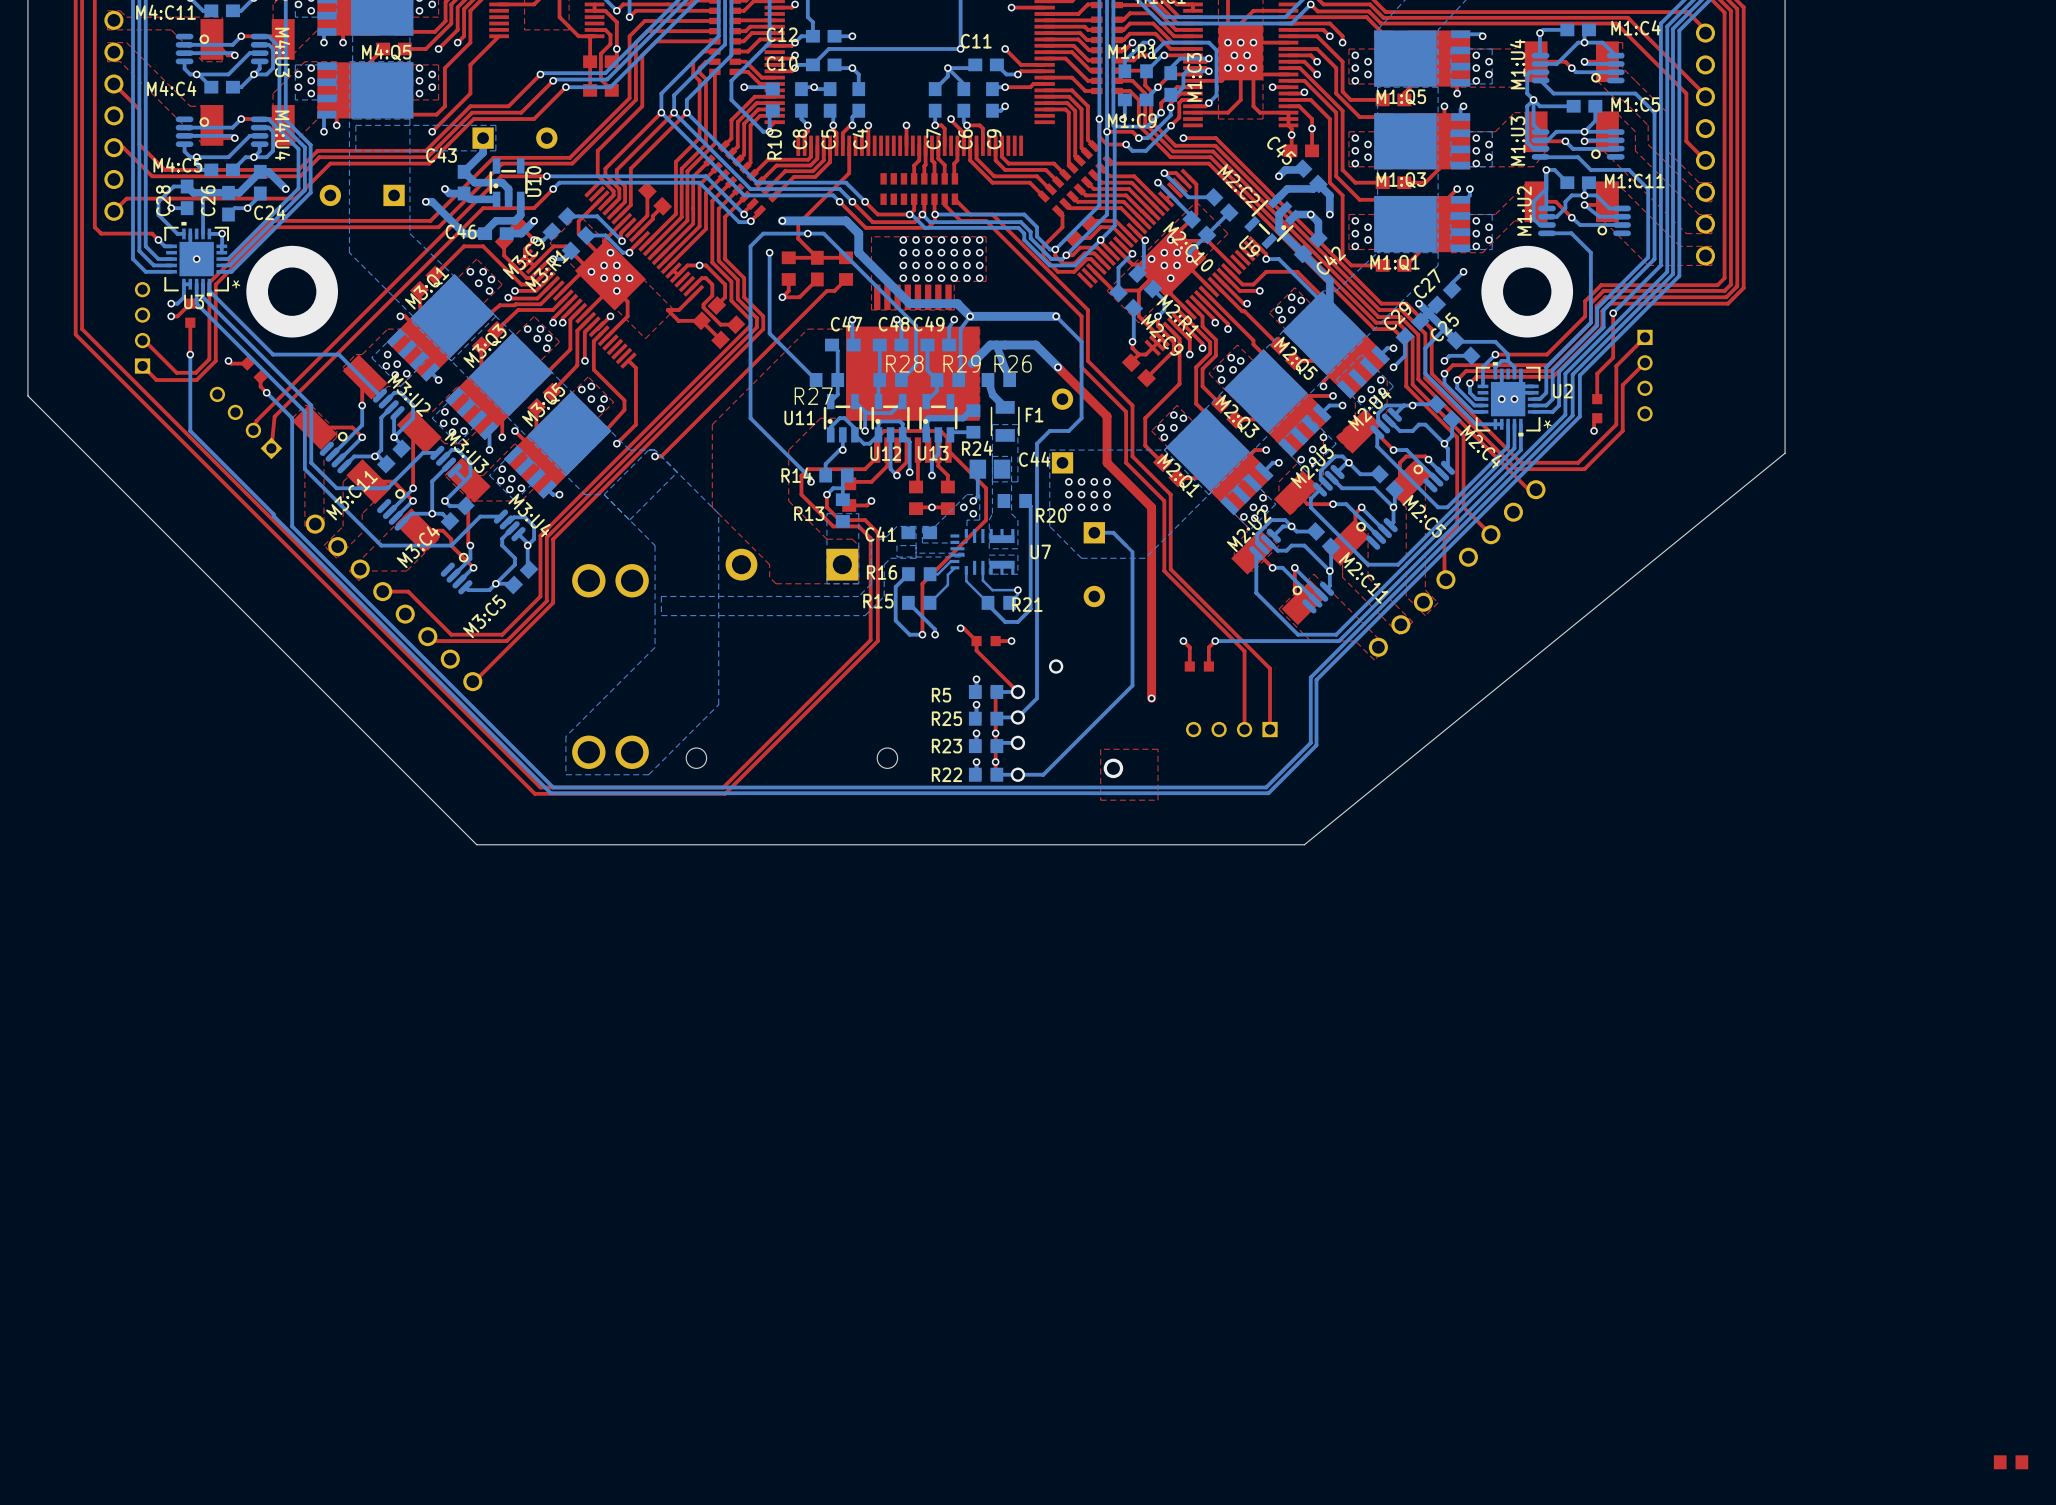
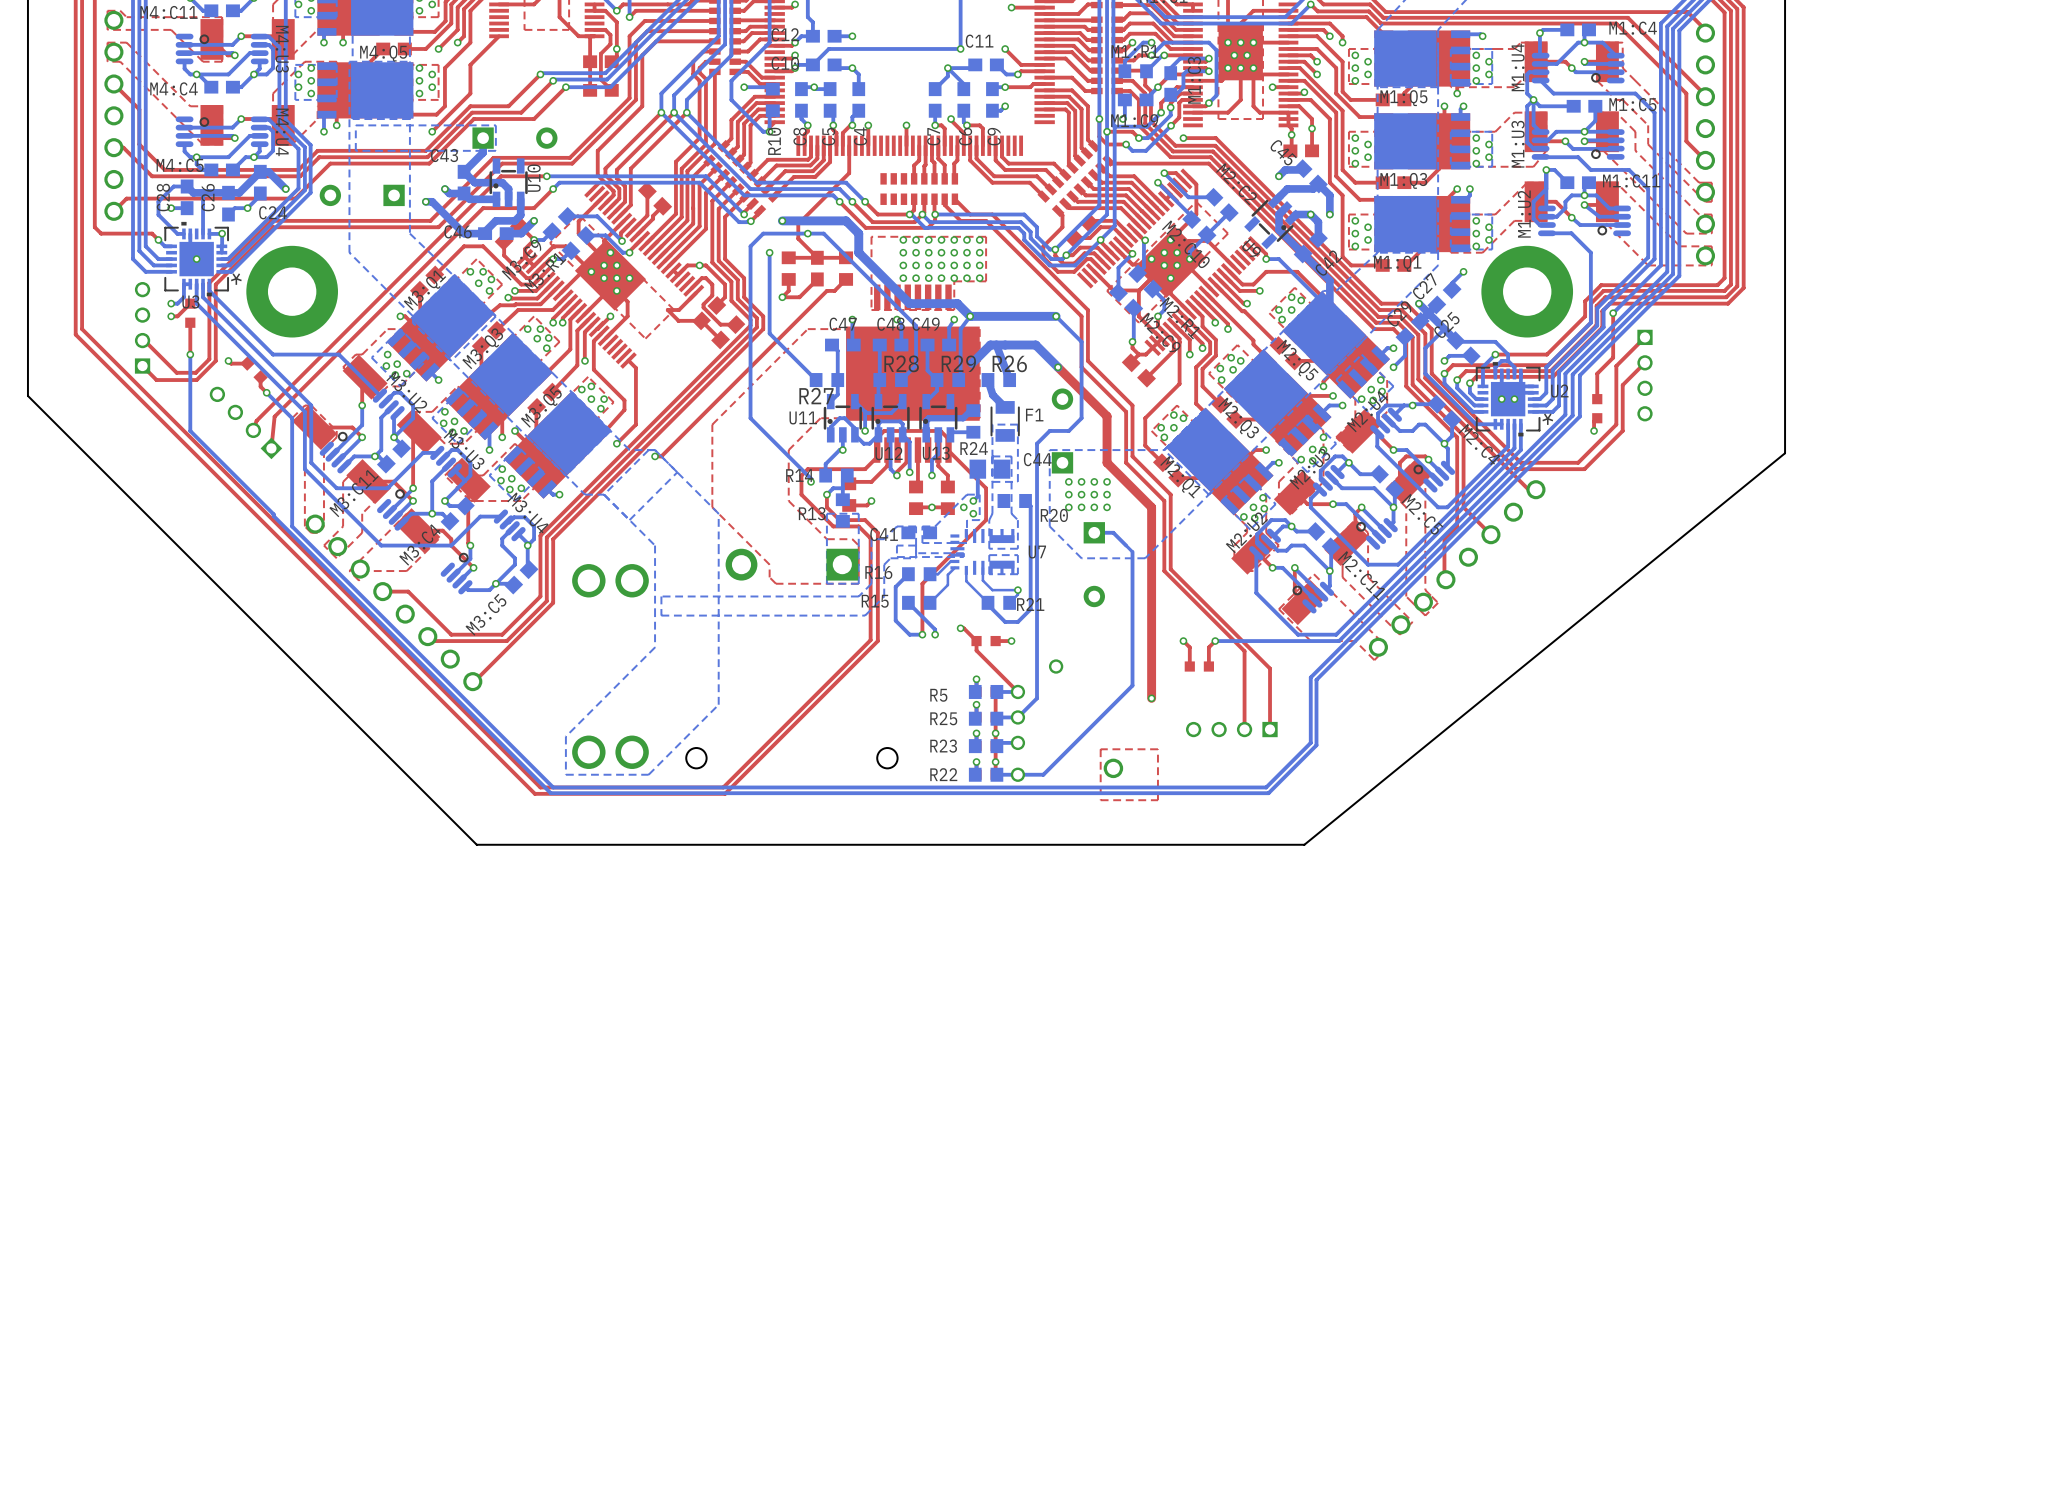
part: (2011, 1462) -> none

